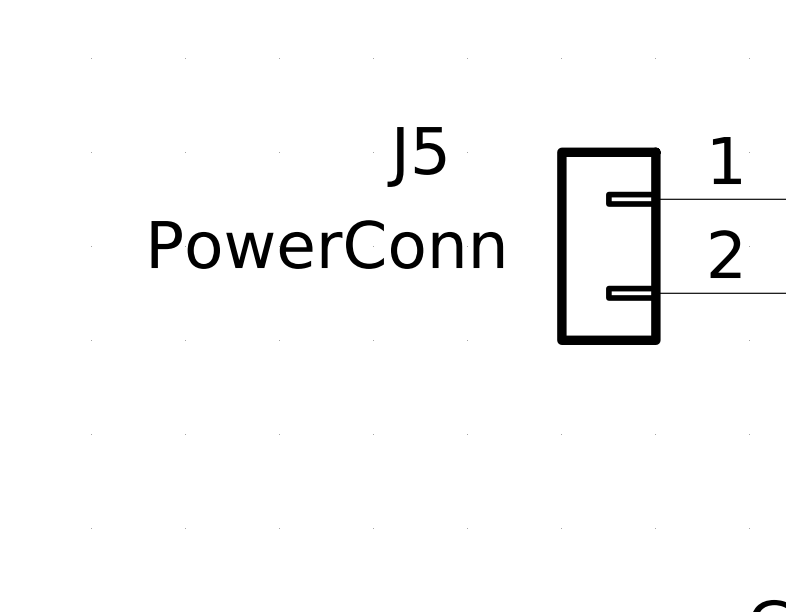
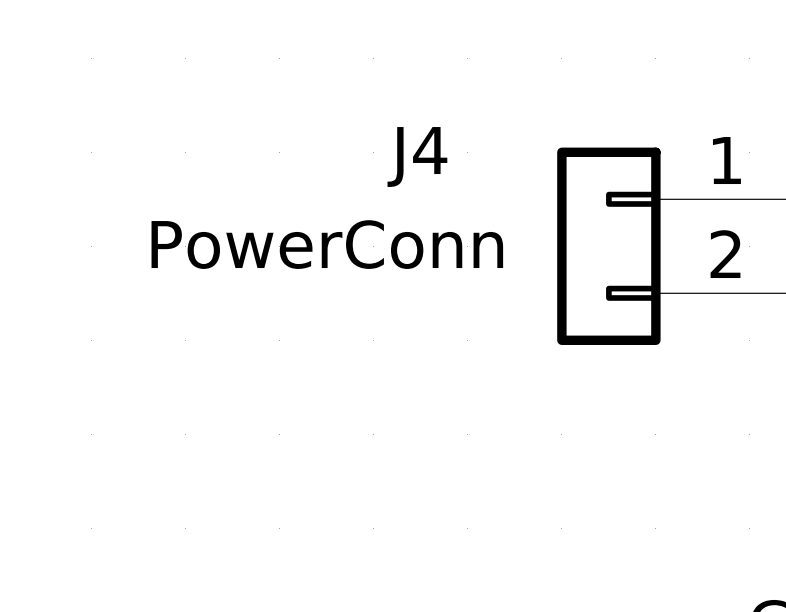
J5 name: J5 (416, 156) -> J4 (417, 156)

